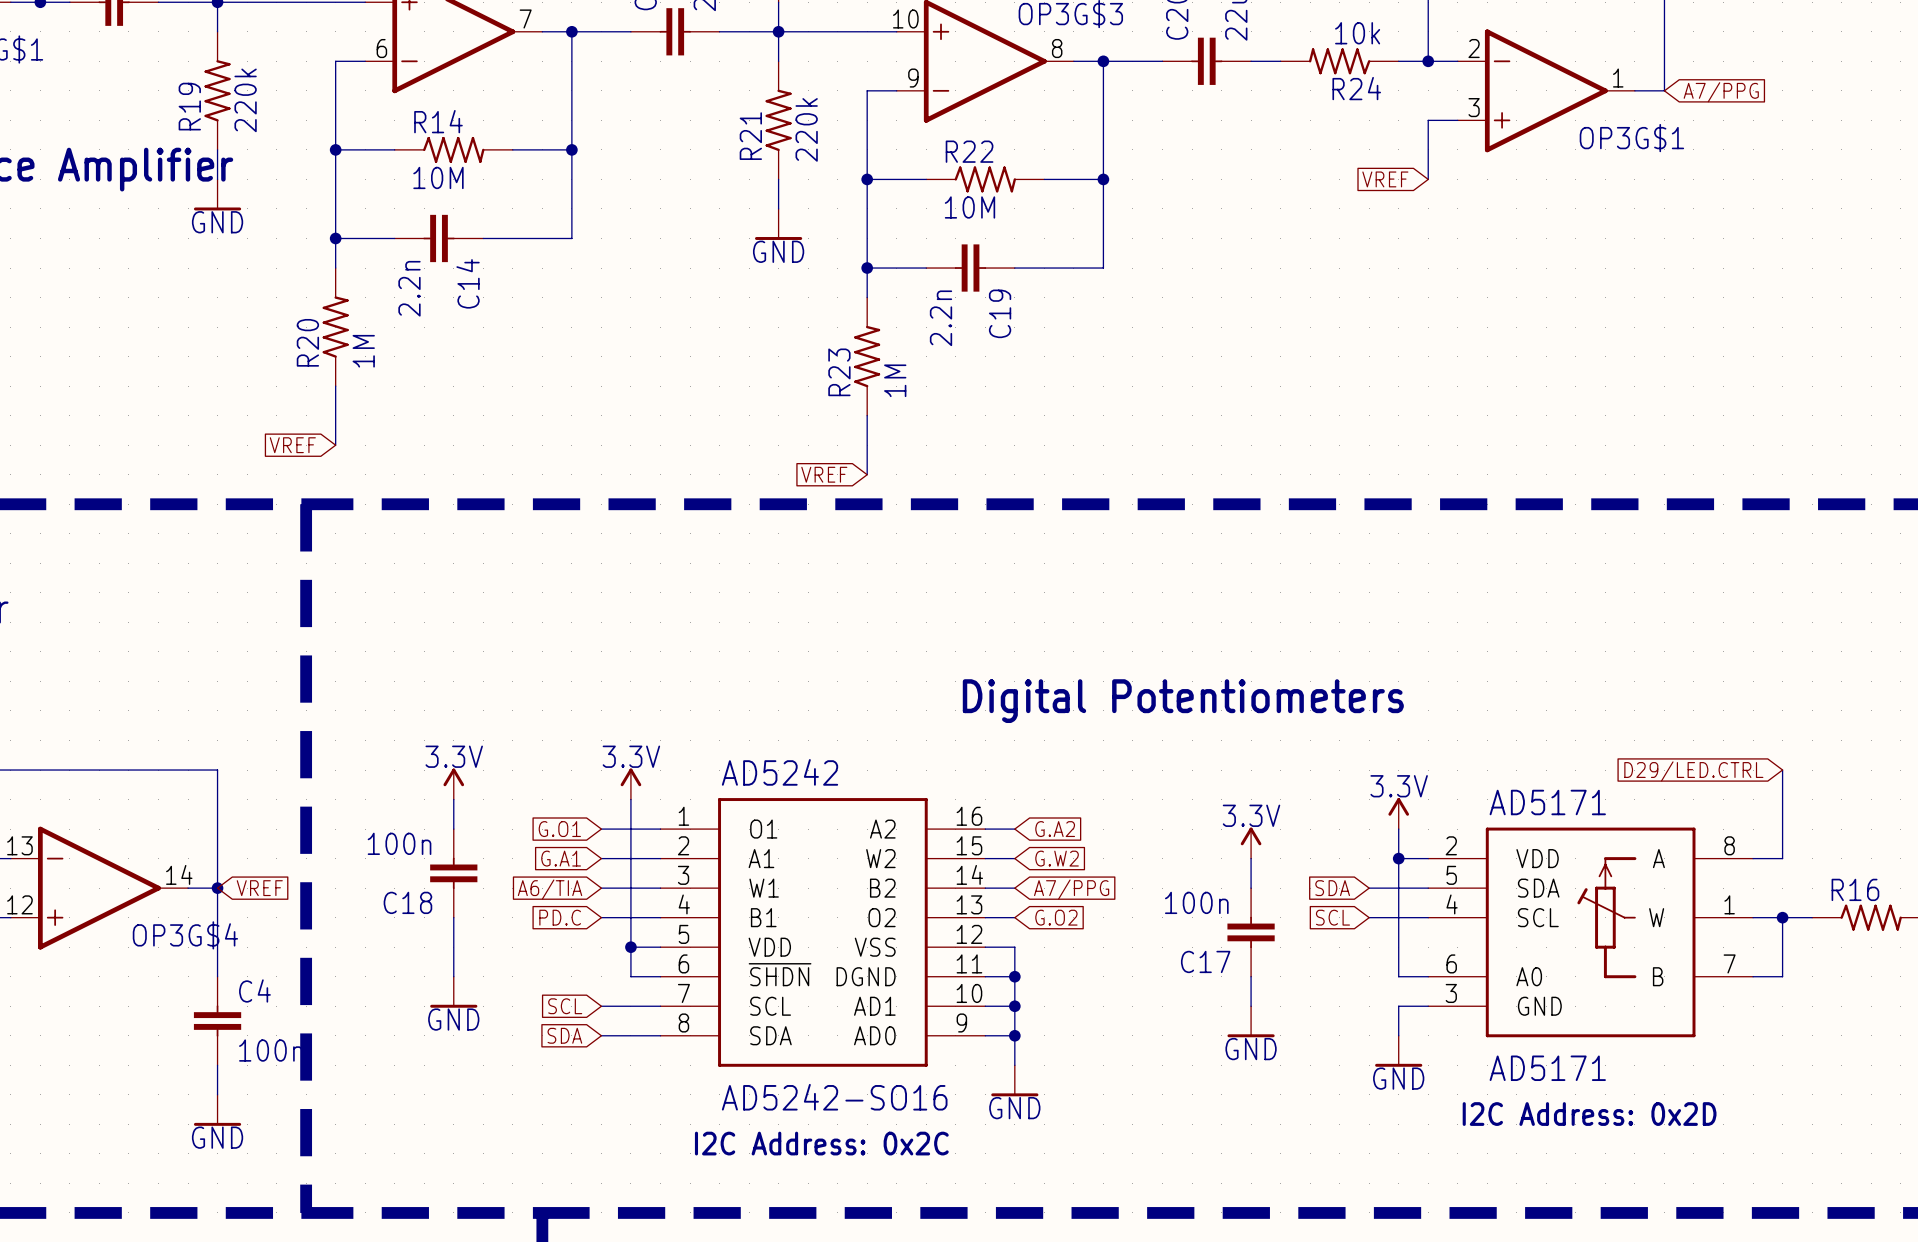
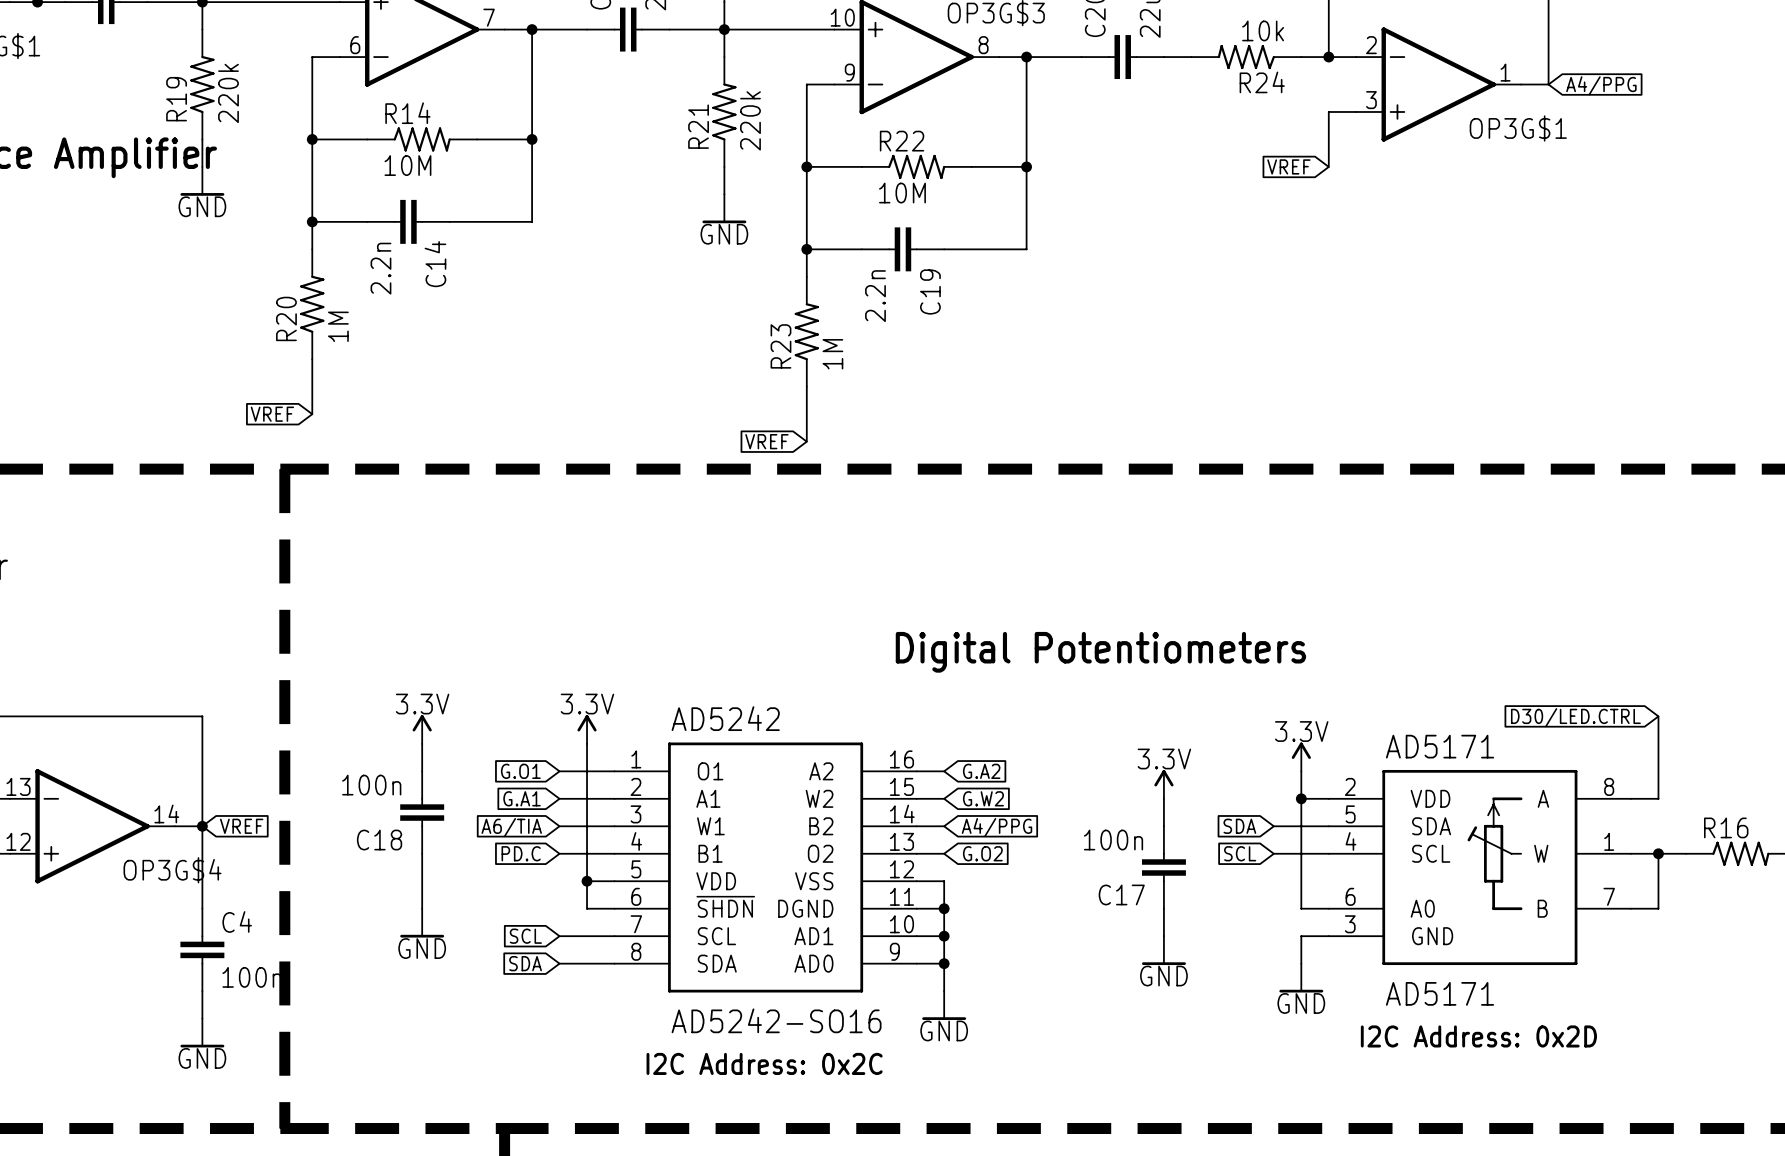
global label: A7/PPG (1721, 92) -> A4/PPG (1601, 85)
global label: D29/LED.CTRL (1693, 771) -> D30/LED.CTRL (1575, 717)
global label: A7/PPG (1071, 889) -> A4/PPG (996, 827)

